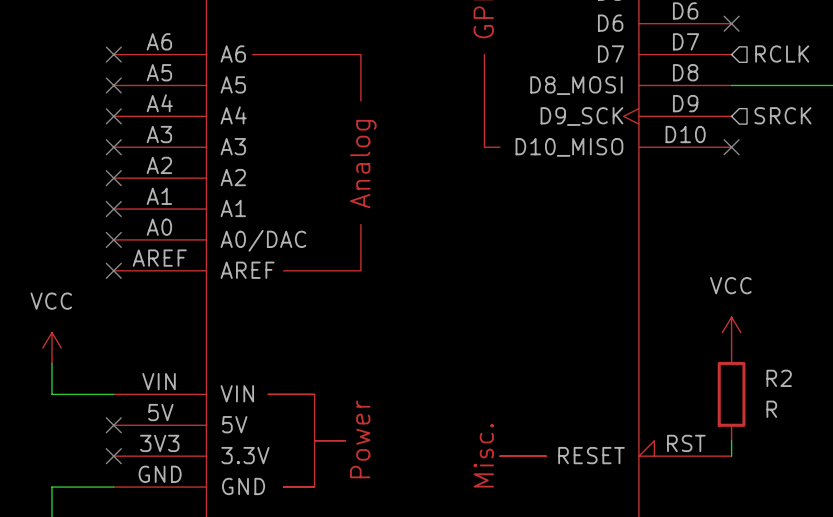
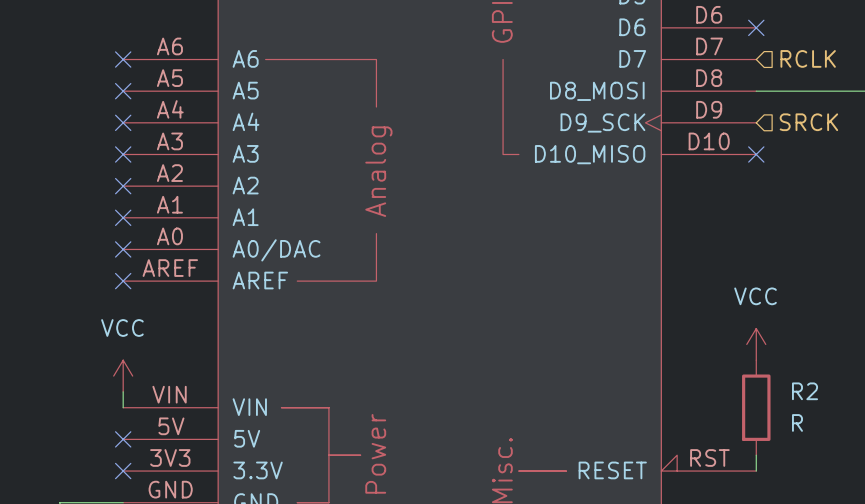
power symbol position: VCC (52, 348) -> VCC (123, 376)
wire: (52, 363) (52, 394) (113, 394) -> (123, 391) (123, 407)

